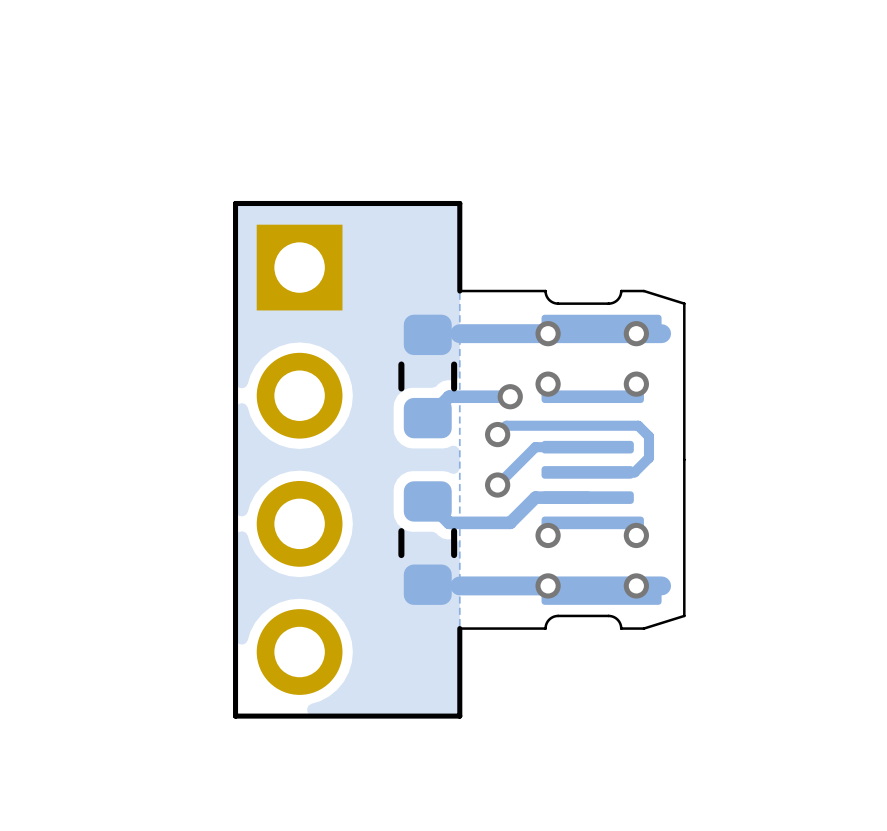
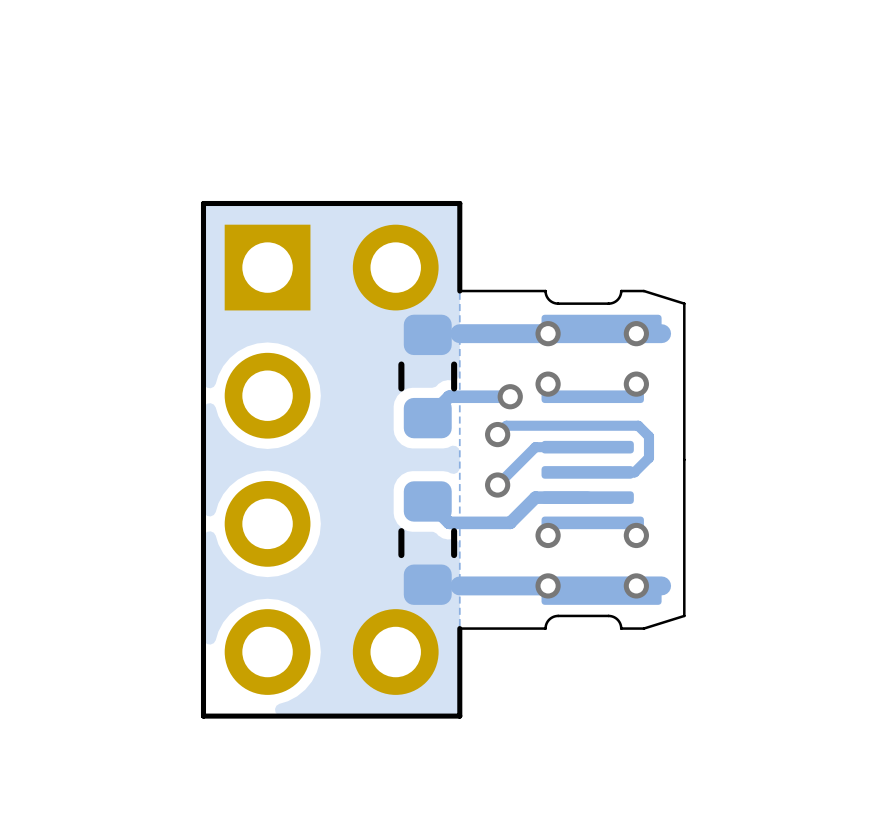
board edge: (235, 203) (235, 716) -> (235, 203) (203, 203) (203, 716) (235, 716)
part: none -> (395, 267)
part position: (299, 459) -> (267, 459)
part: none -> (395, 652)

